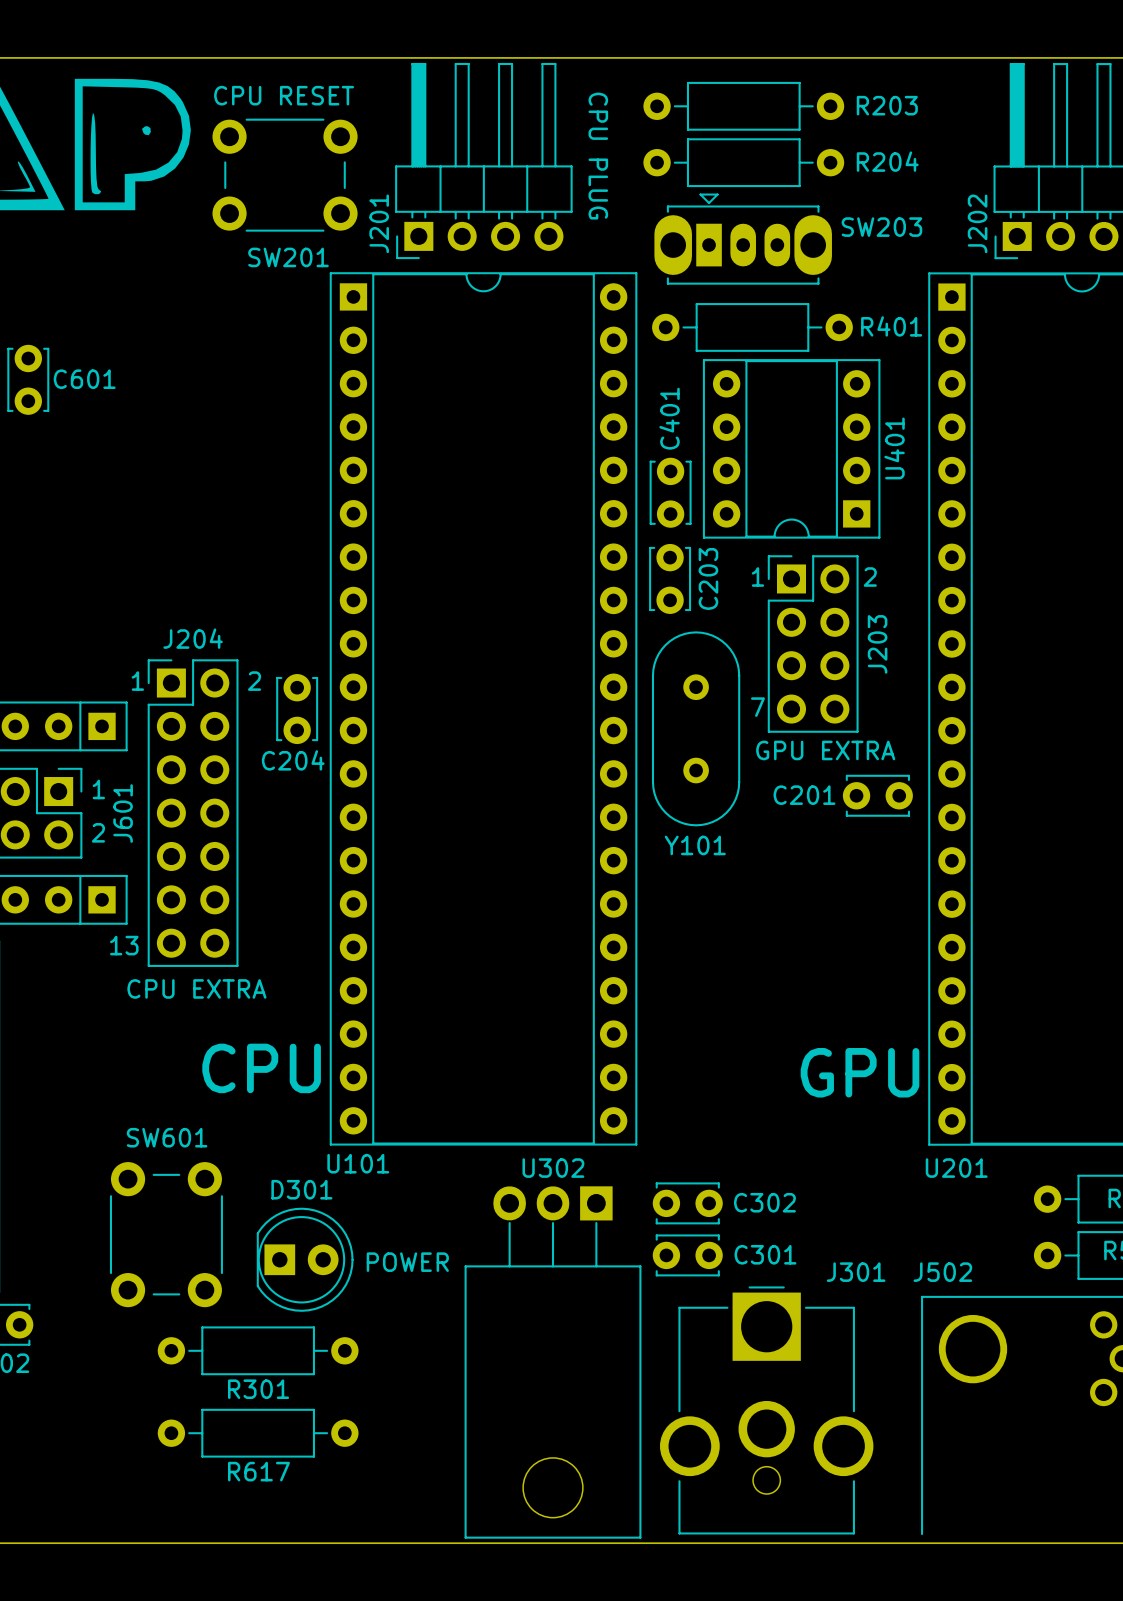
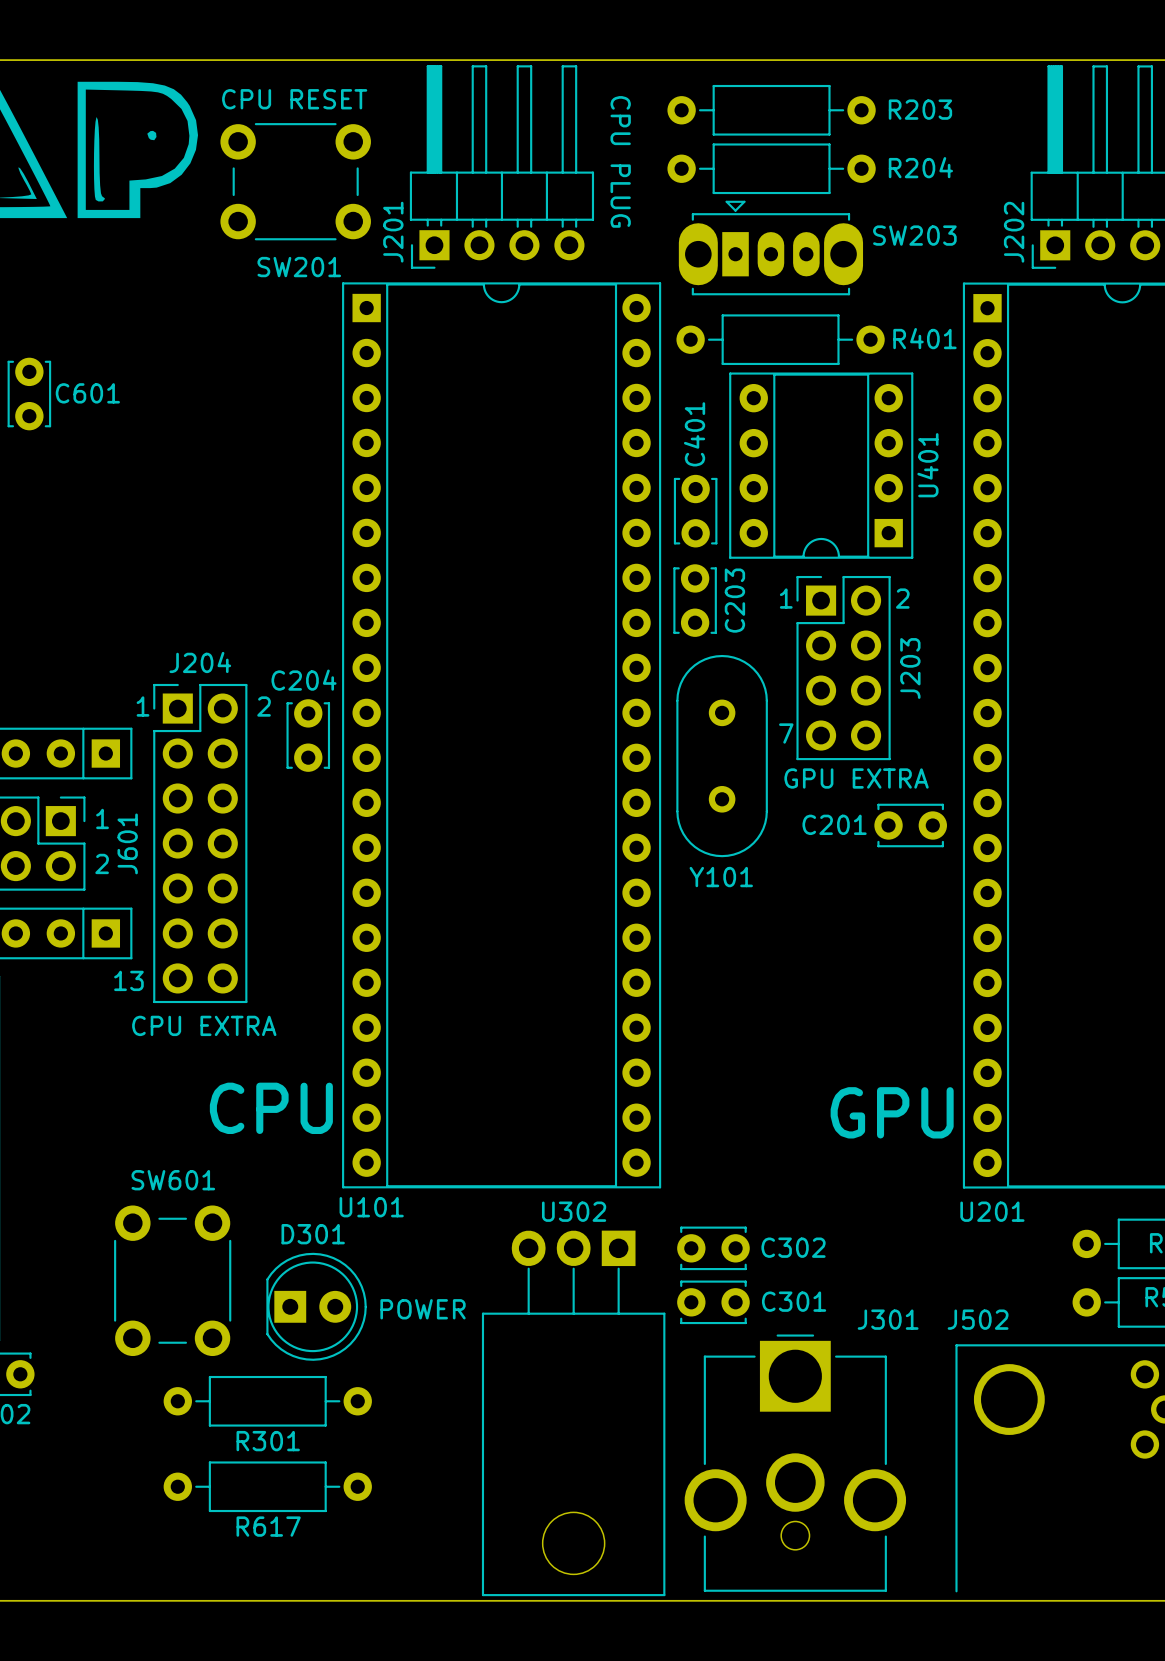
C204 name position: C204 (293, 760) -> C204 (304, 680)

